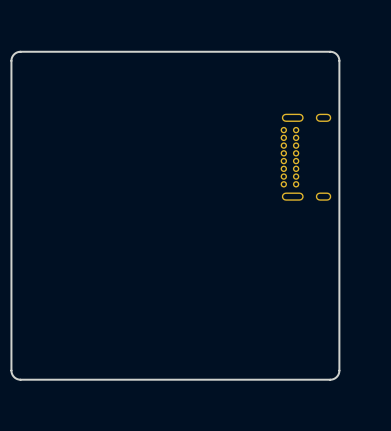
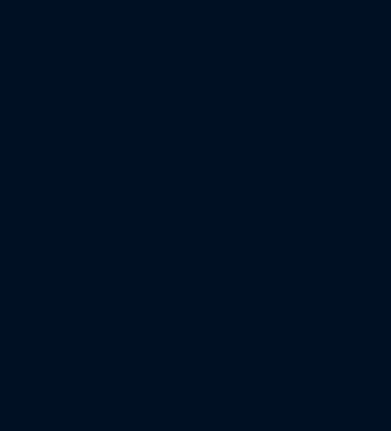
board edge: (330, 51) (20, 51) (14, 54) (11, 60) (11, 370) (14, 377) (20, 379) (330, 379) (336, 377) (339, 370) (339, 60) (336, 54) (330, 51) -> none
part: (305, 157) -> none

